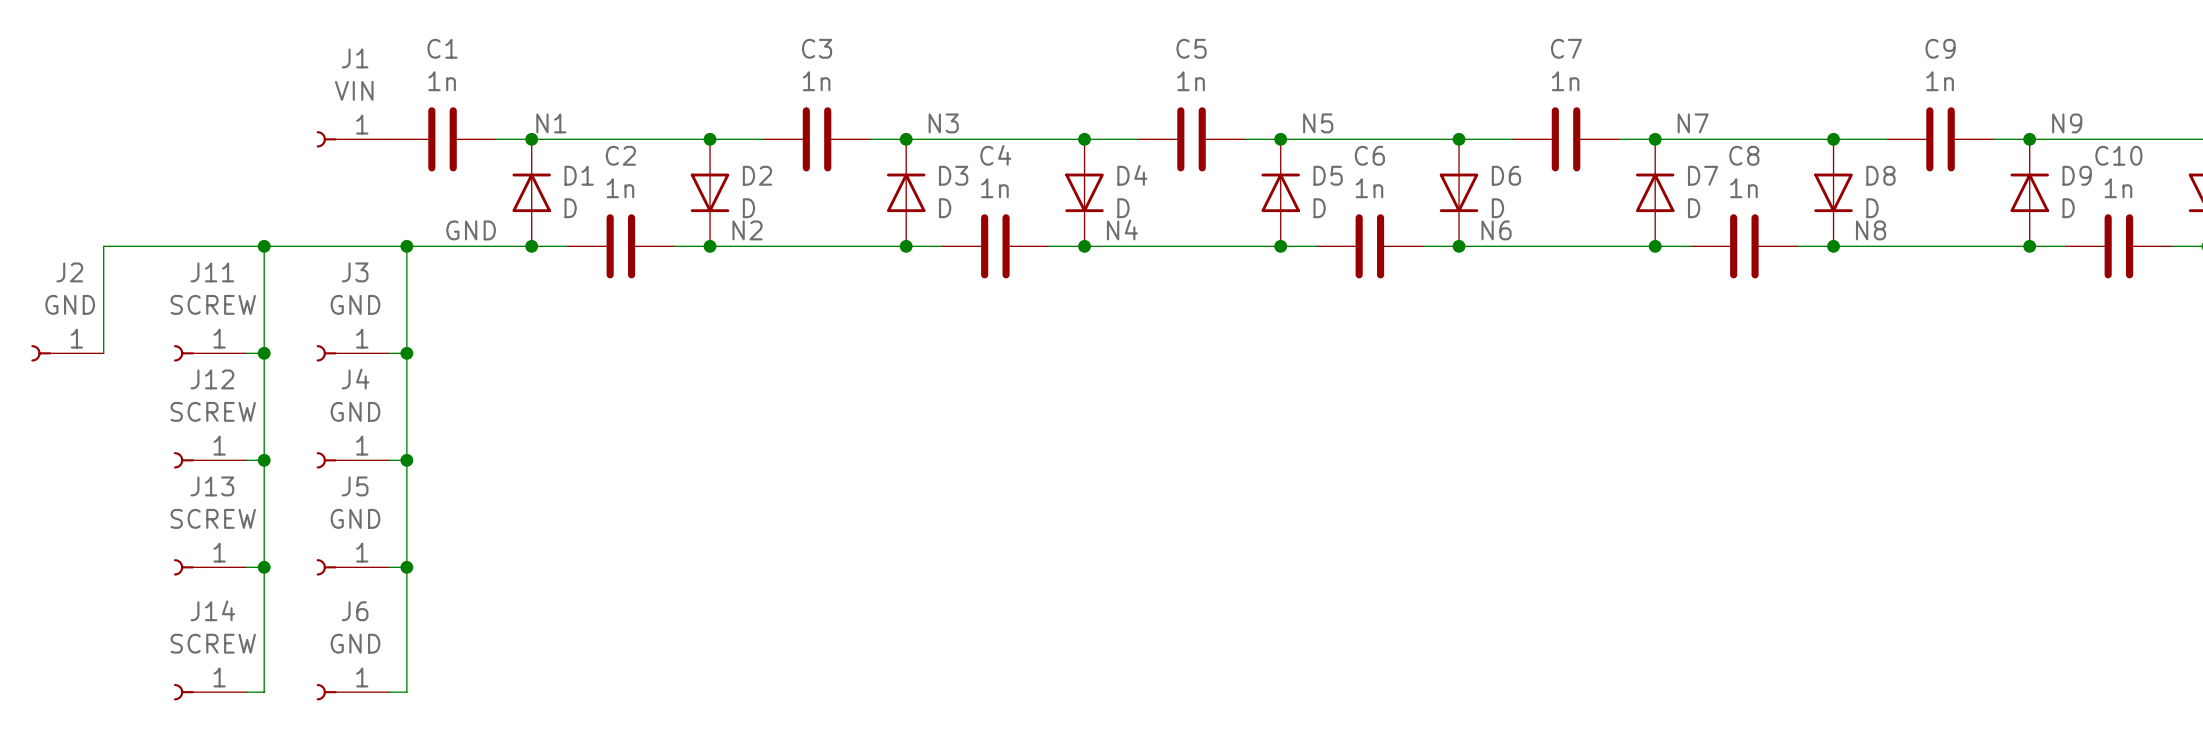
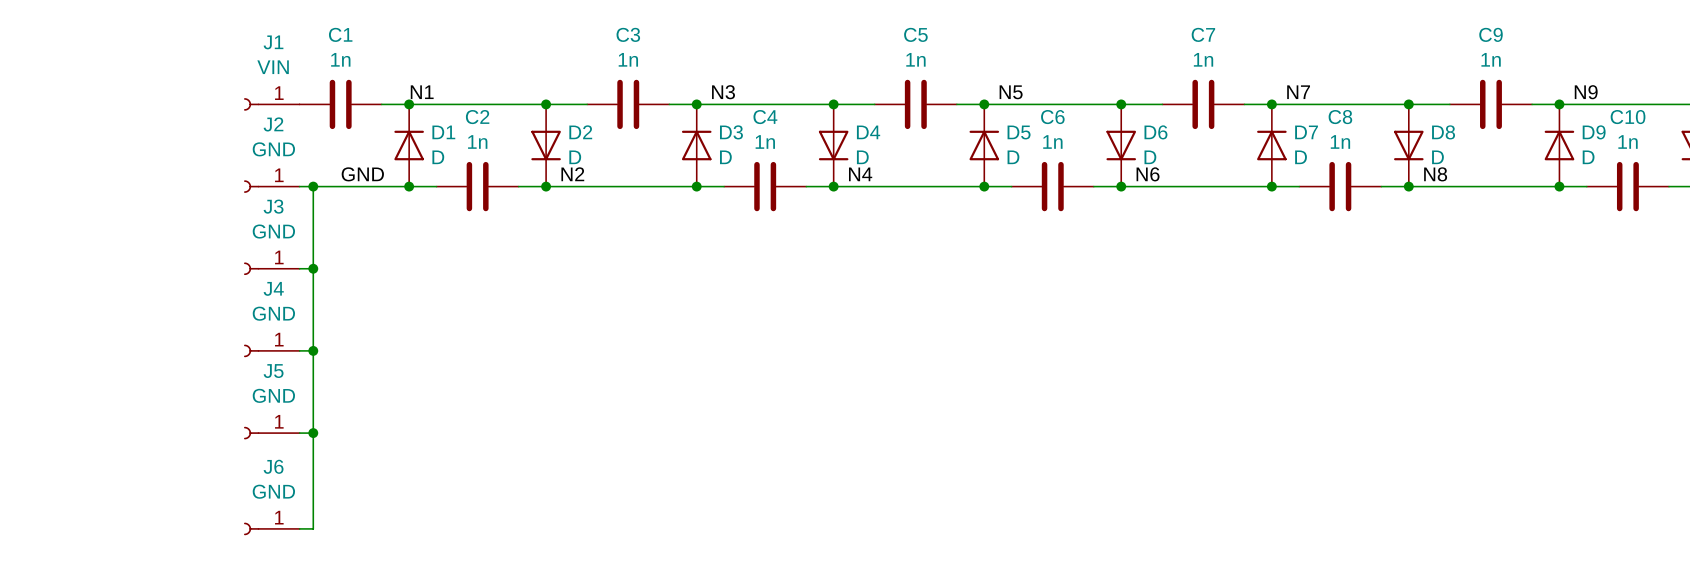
wire: (264, 246) (264, 692) (246, 692) -> none
junction: (264, 246) -> none
wire: (389, 246) (103, 246) (103, 353) -> none
J2 position: (67, 353) -> (271, 186)
J11: SCREW (210, 353) -> none
wire: (246, 353) (264, 353) -> none
junction: (264, 353) -> none
J12: SCREW (210, 460) -> none
wire: (246, 460) (264, 460) -> none
junction: (264, 460) -> none
J13: SCREW (210, 567) -> none
wire: (246, 567) (264, 567) -> none
junction: (264, 567) -> none
J14: SCREW (210, 692) -> none

